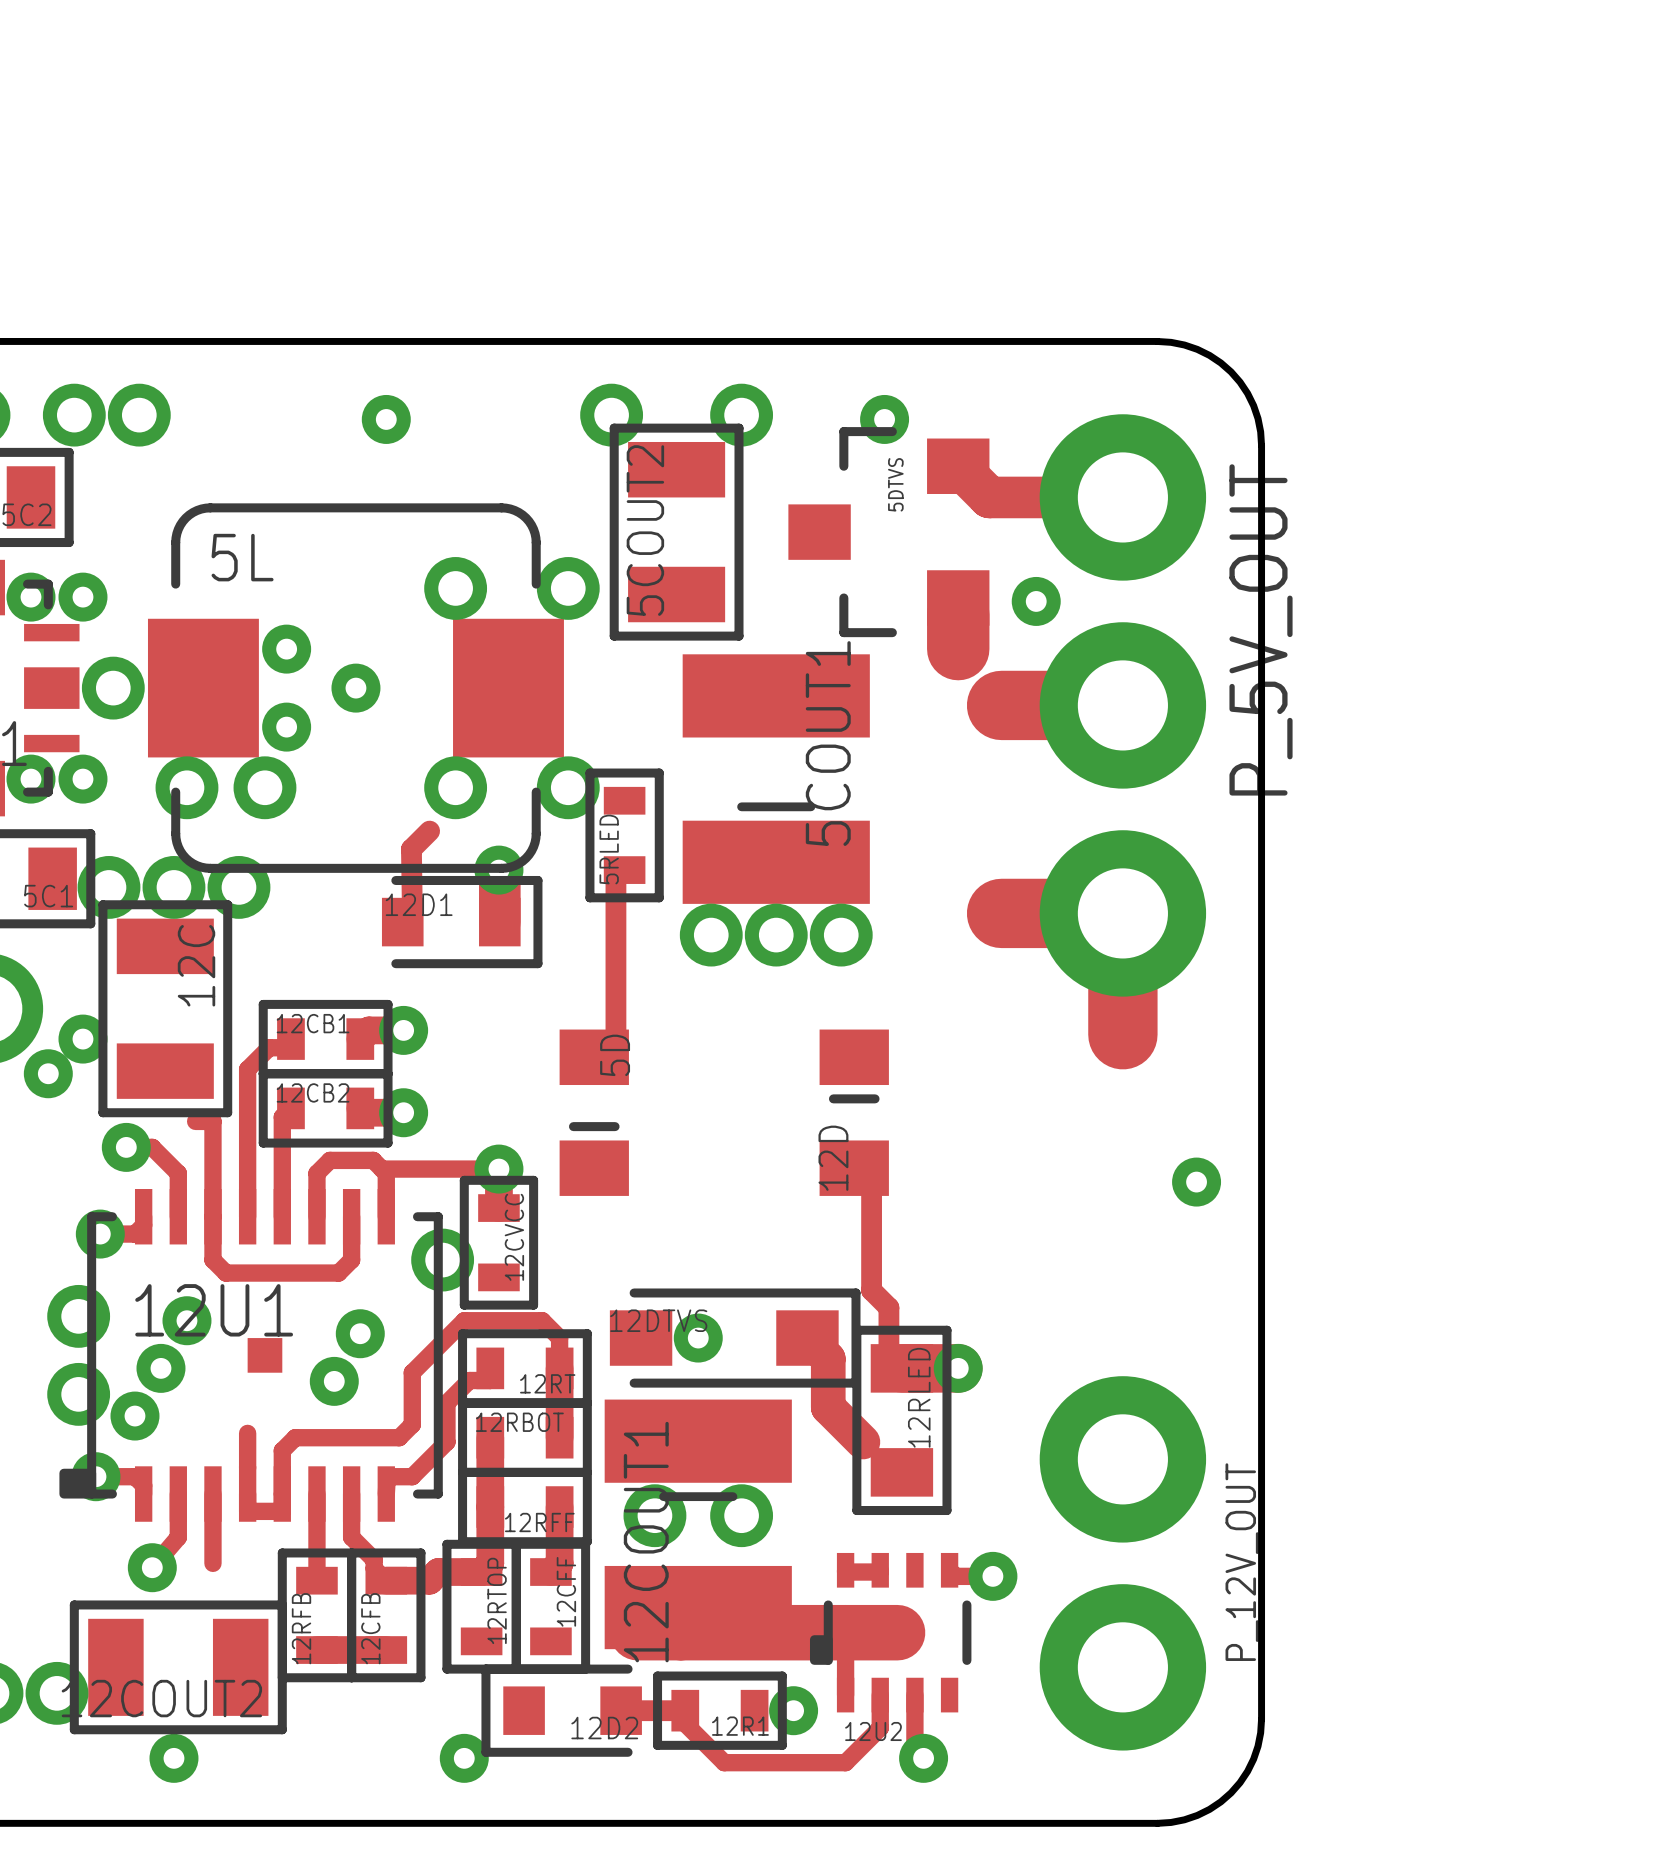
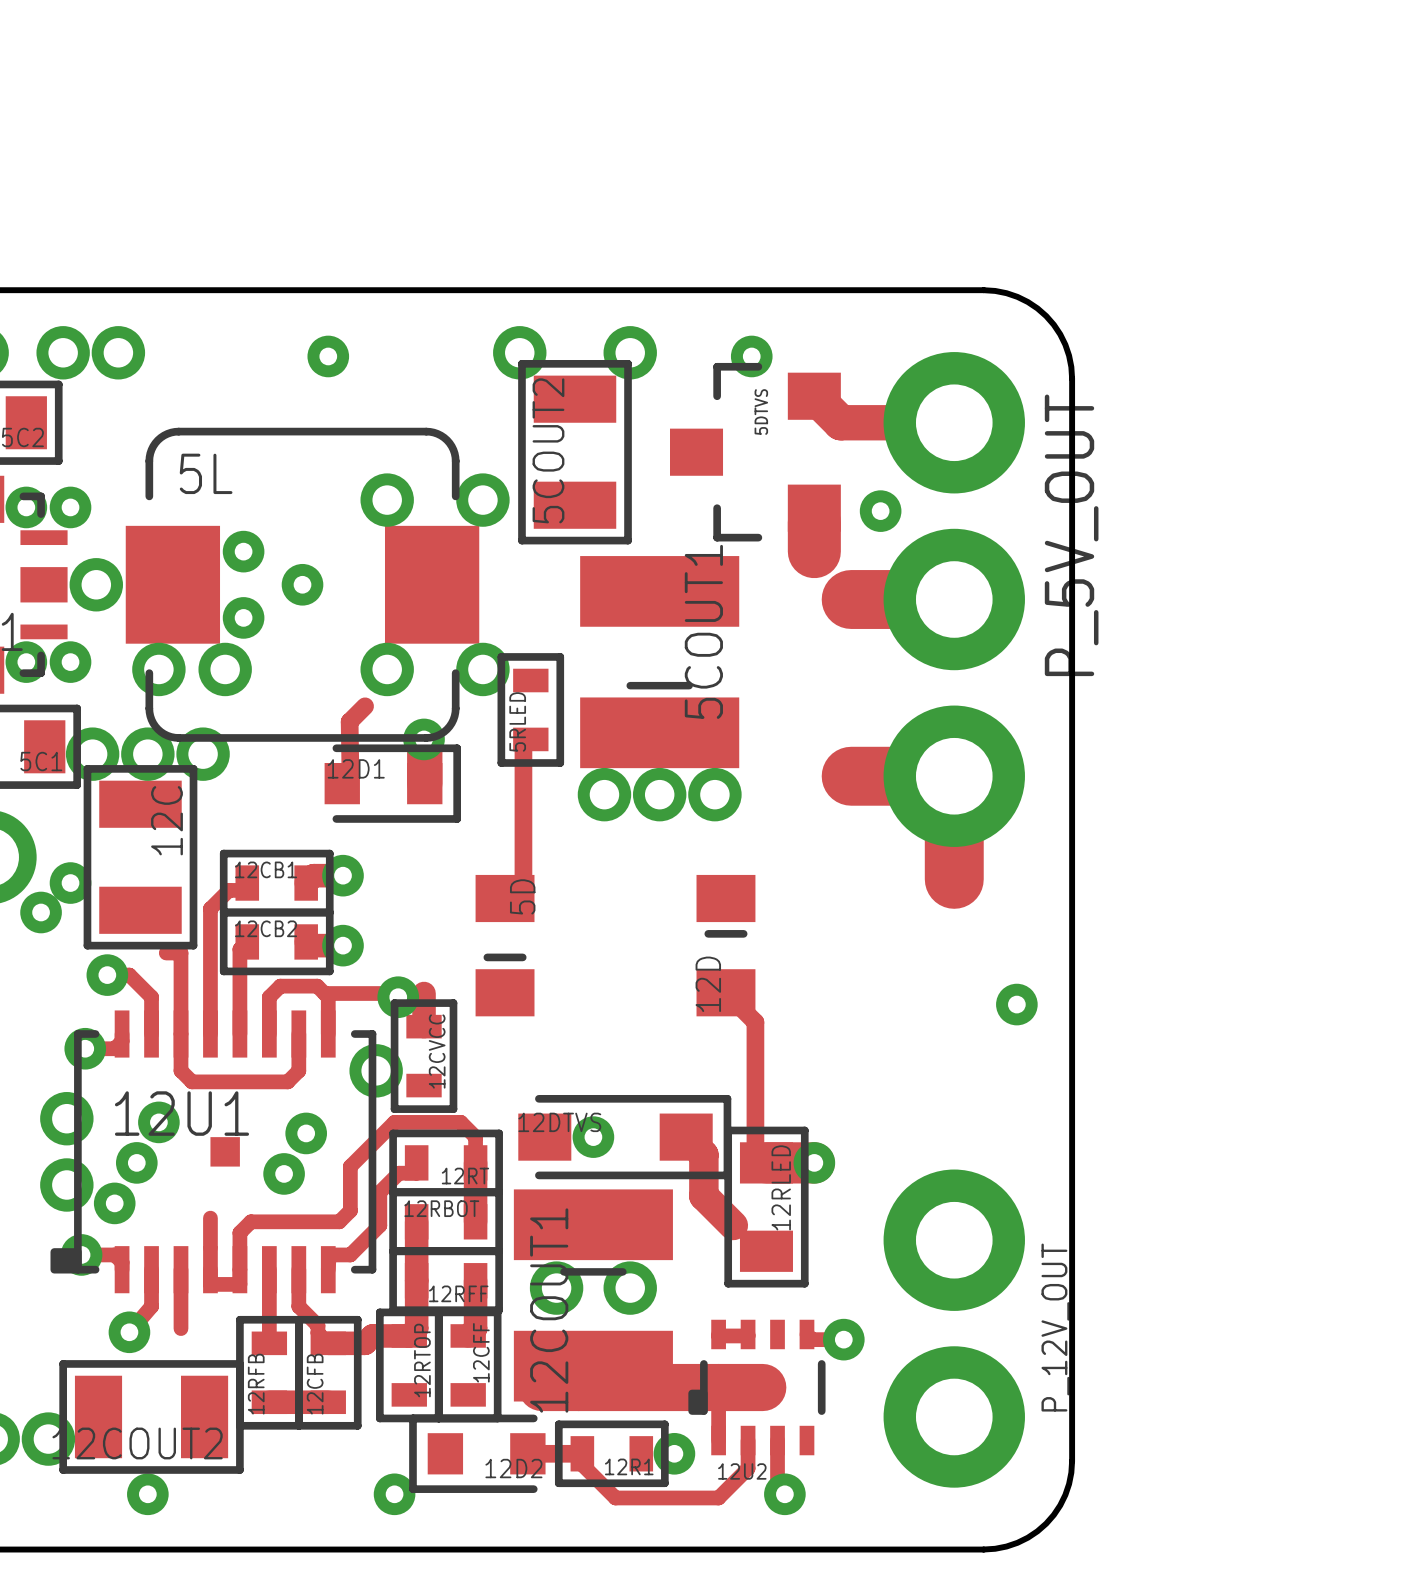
via position: (498, 1169) -> (398, 997)
track: (871, 1185) (871, 1290) (888, 1307) -> (740, 1007) (755, 1022) (755, 1111)

